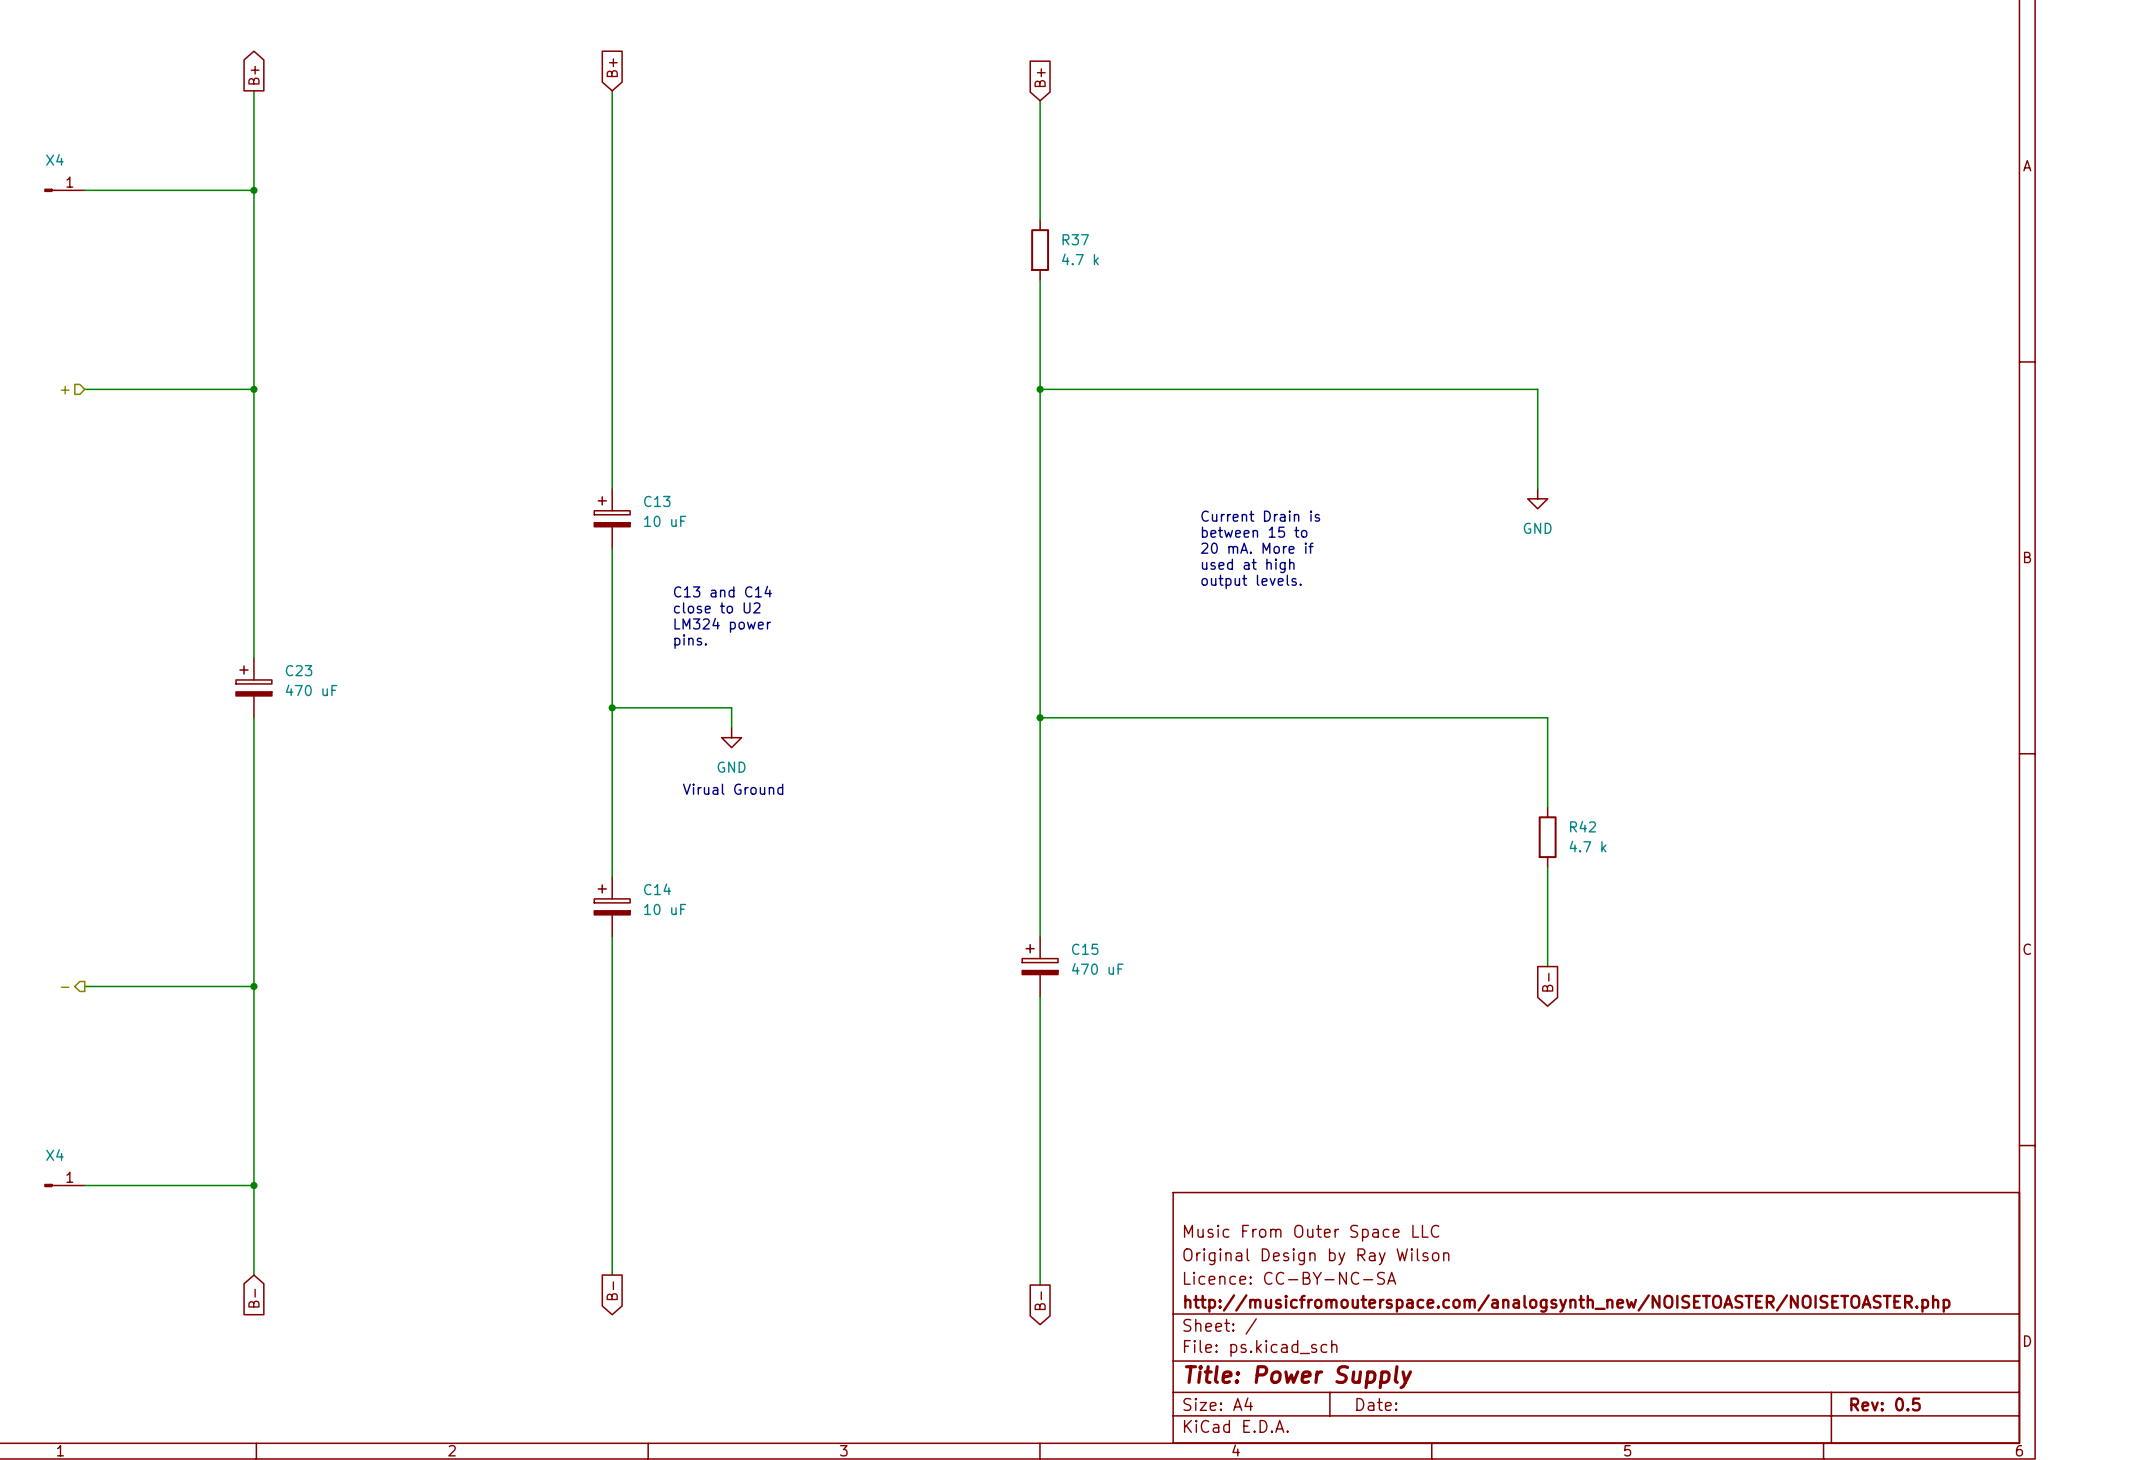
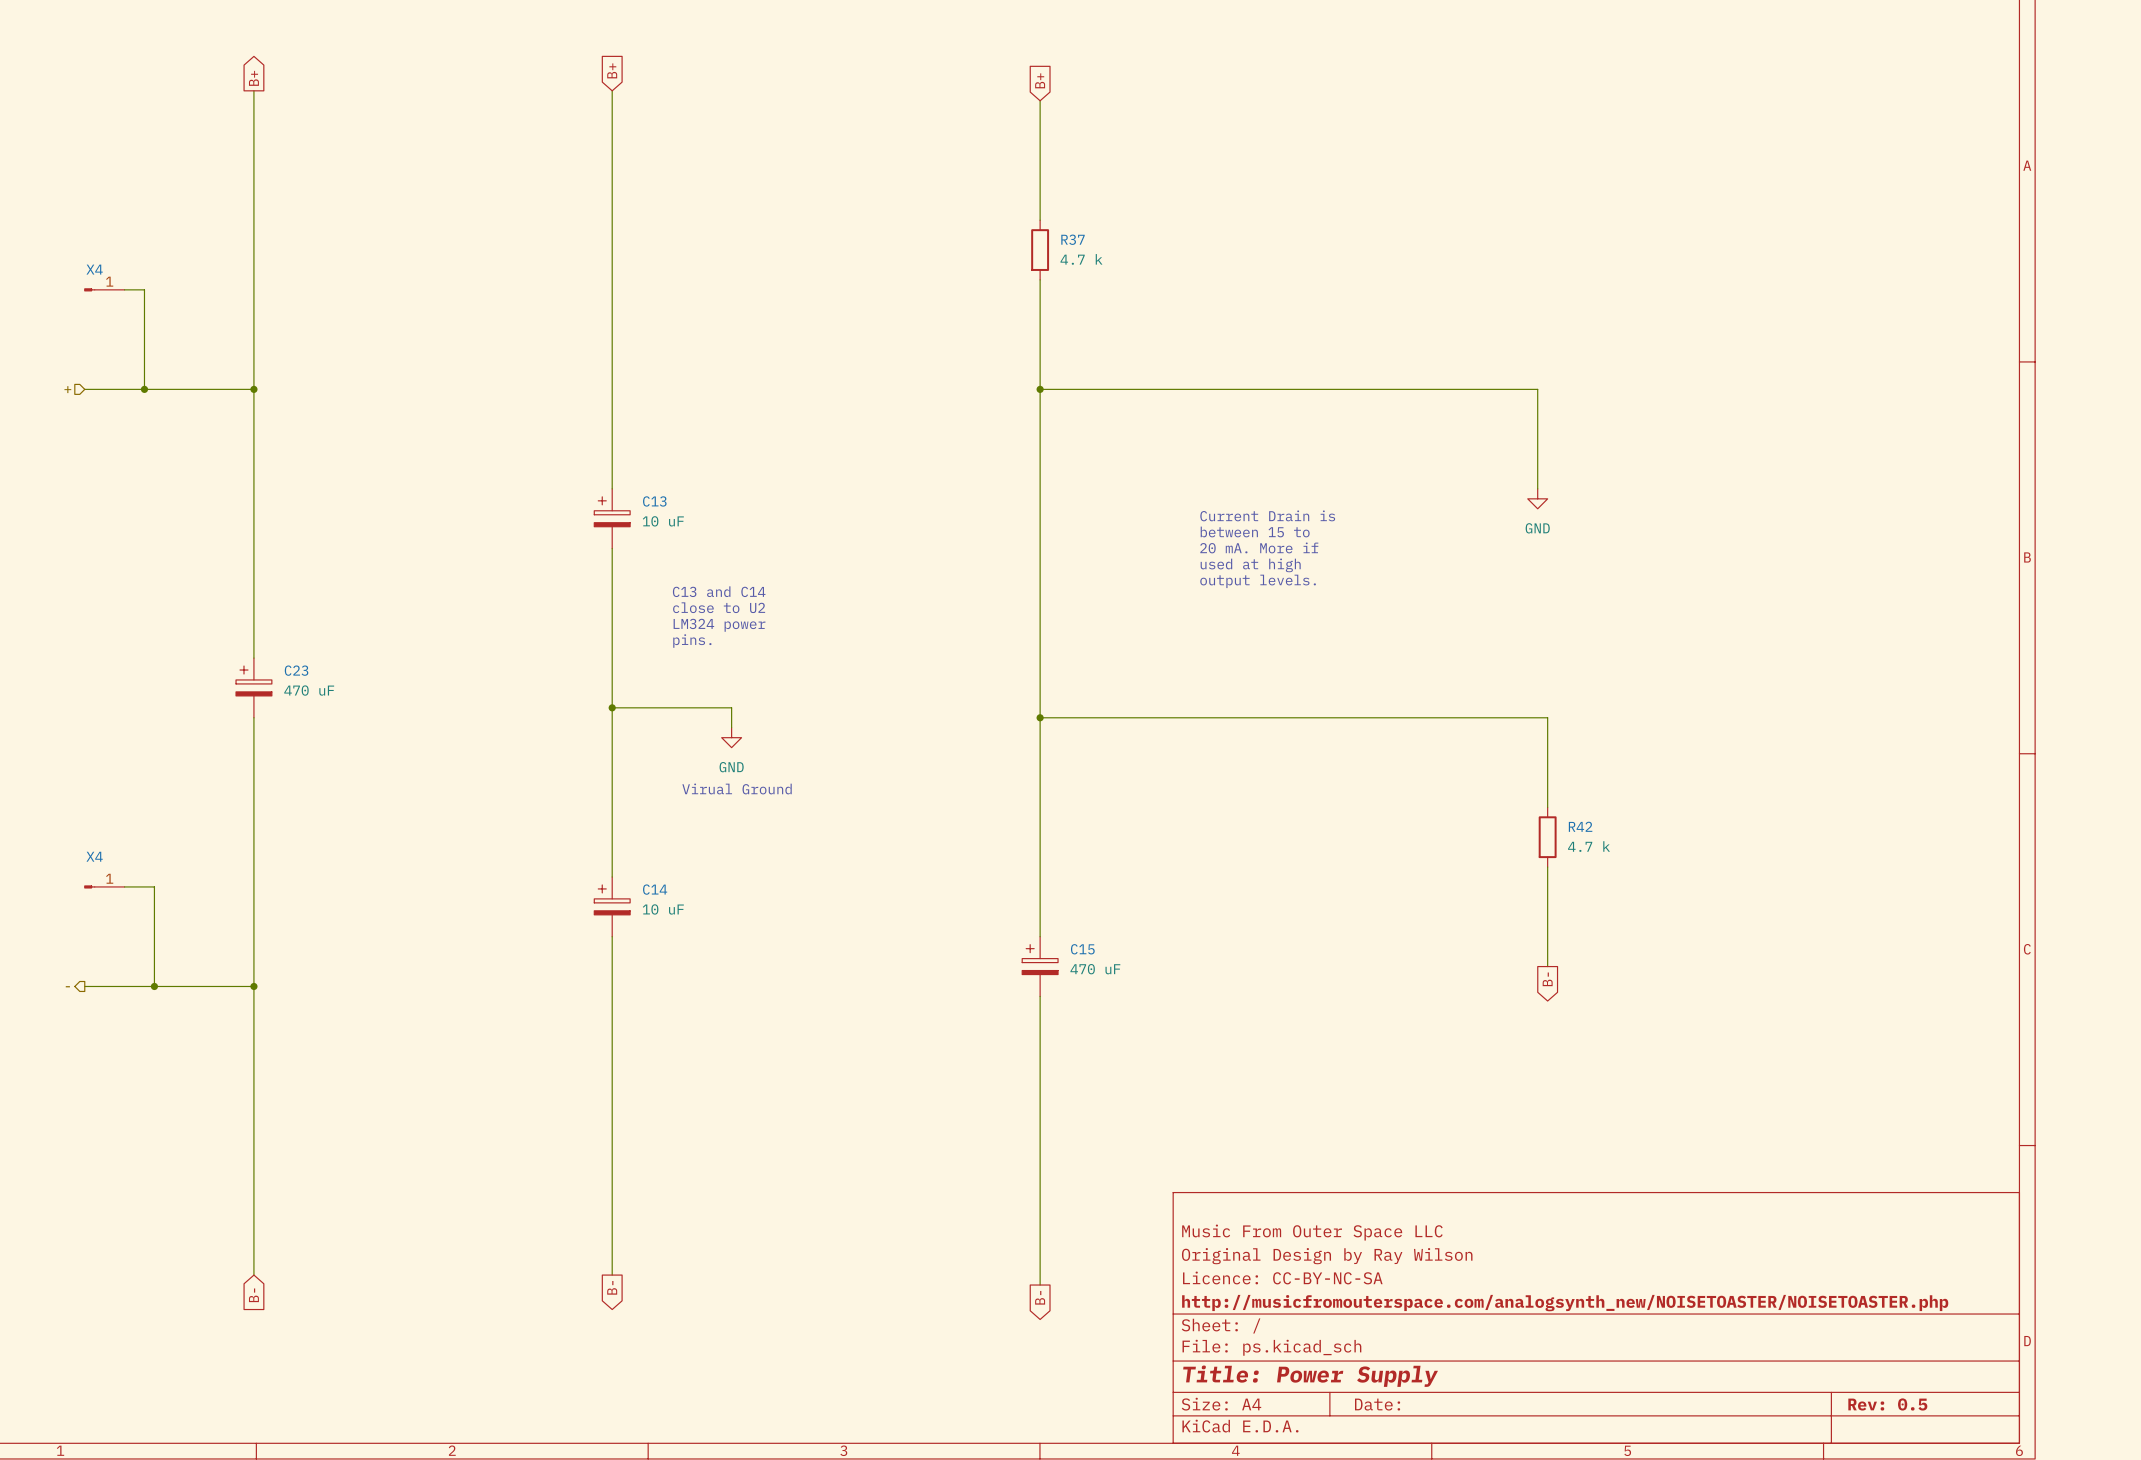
X4 name position: X4 (54, 159) -> X4 (94, 269)
X4 position: (64, 190) -> (104, 289)
wire: (84, 190) (253, 190) -> none
junction: (253, 190) -> none
wire: none -> (124, 289) (144, 289) (144, 389)
junction: none -> (144, 389)
X4: none -> (104, 886)
wire: none -> (124, 886) (154, 886) (154, 986)
junction: none -> (154, 986)
X4: (64, 1185) -> none
wire: (84, 1185) (253, 1185) -> none
junction: (253, 1185) -> none

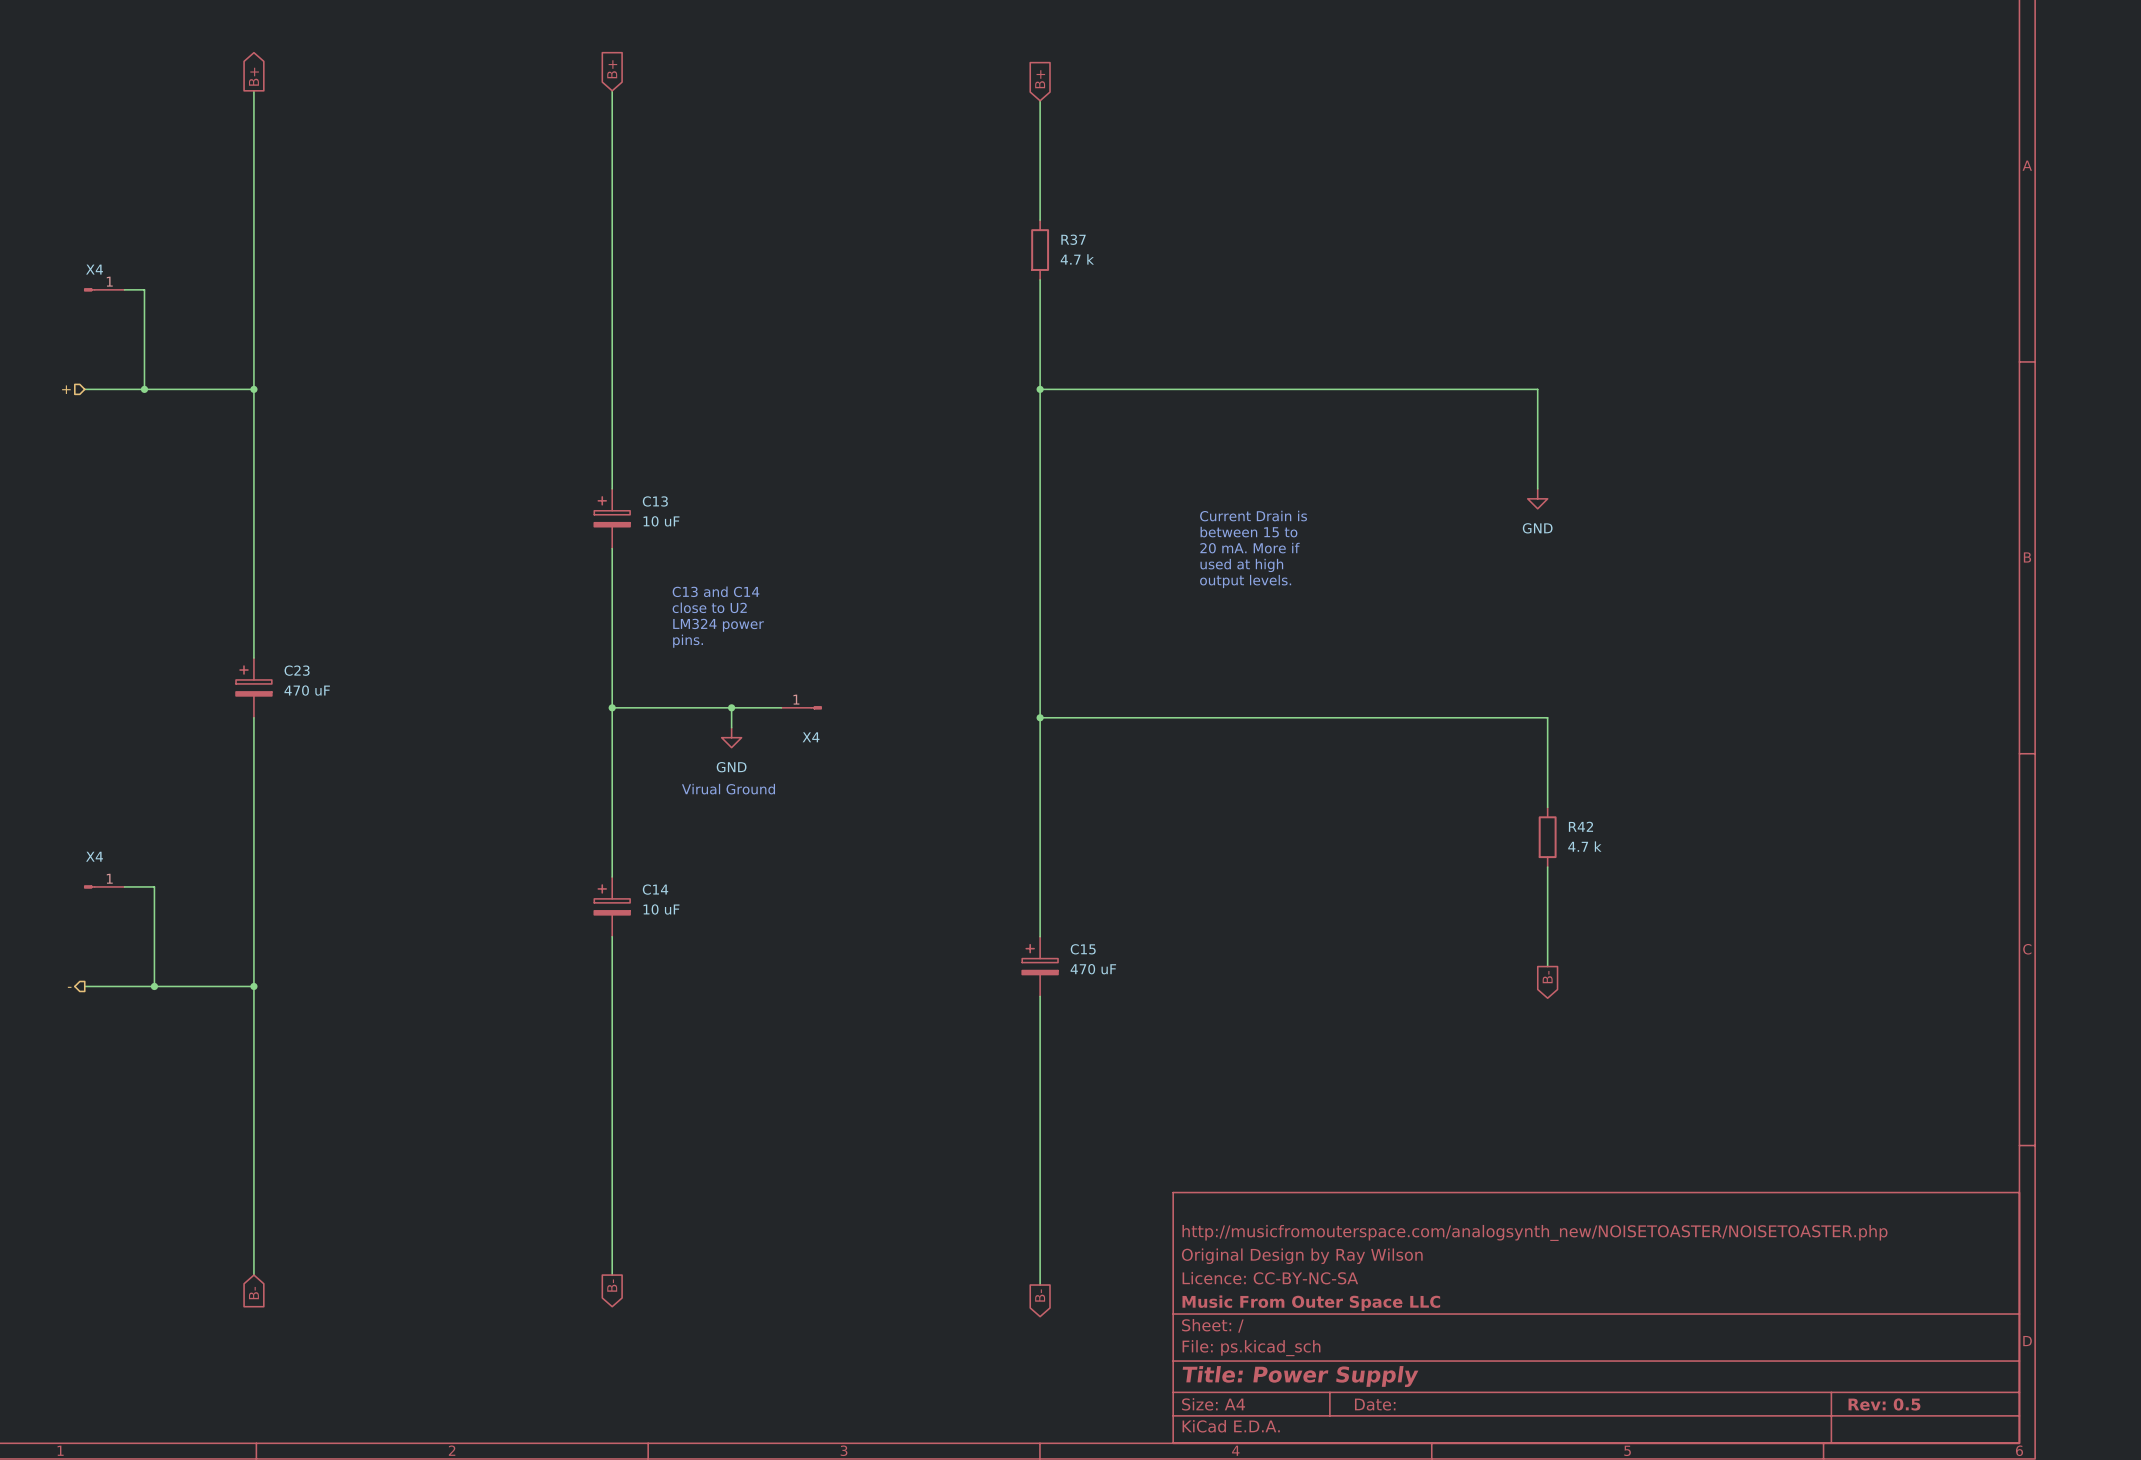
wire: none -> (731, 707) (781, 707)
junction: none -> (731, 707)
X4: none -> (801, 707)
title block: Music From Outer Space LLC (1312, 1232) -> http://musicfromouterspace.com/analogsynth_new/NOISETOASTER/NOISETOASTER.php (1534, 1232)
title block: http://musicfromouterspace.com/analogsynth_new/NOISETOASTER/NOISETOASTER.php (1565, 1303) -> Music From Outer Space LLC (1311, 1303)

